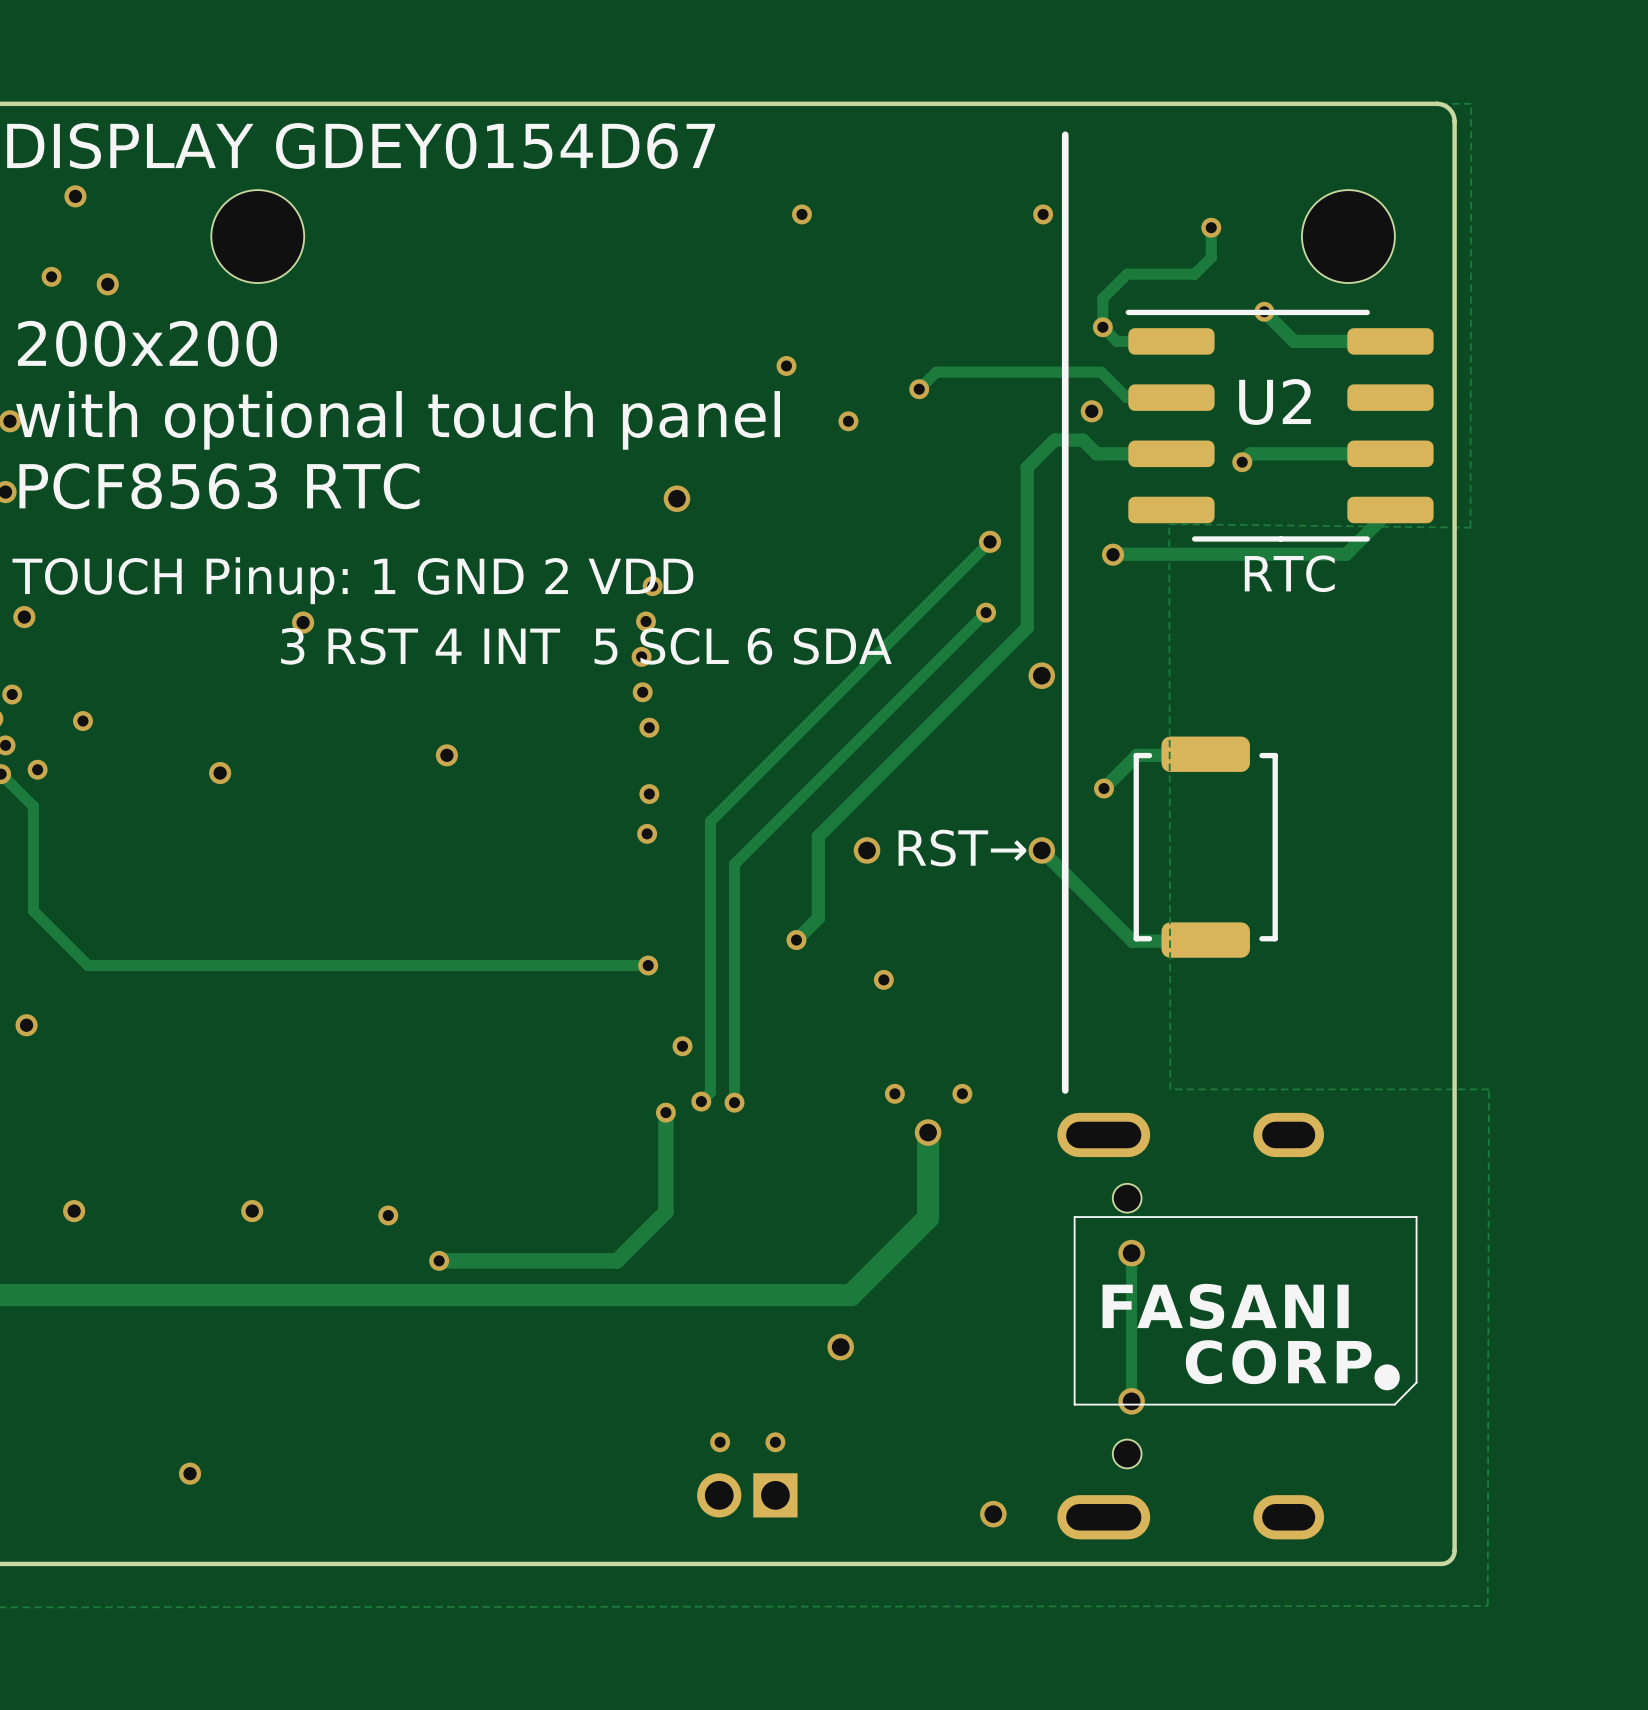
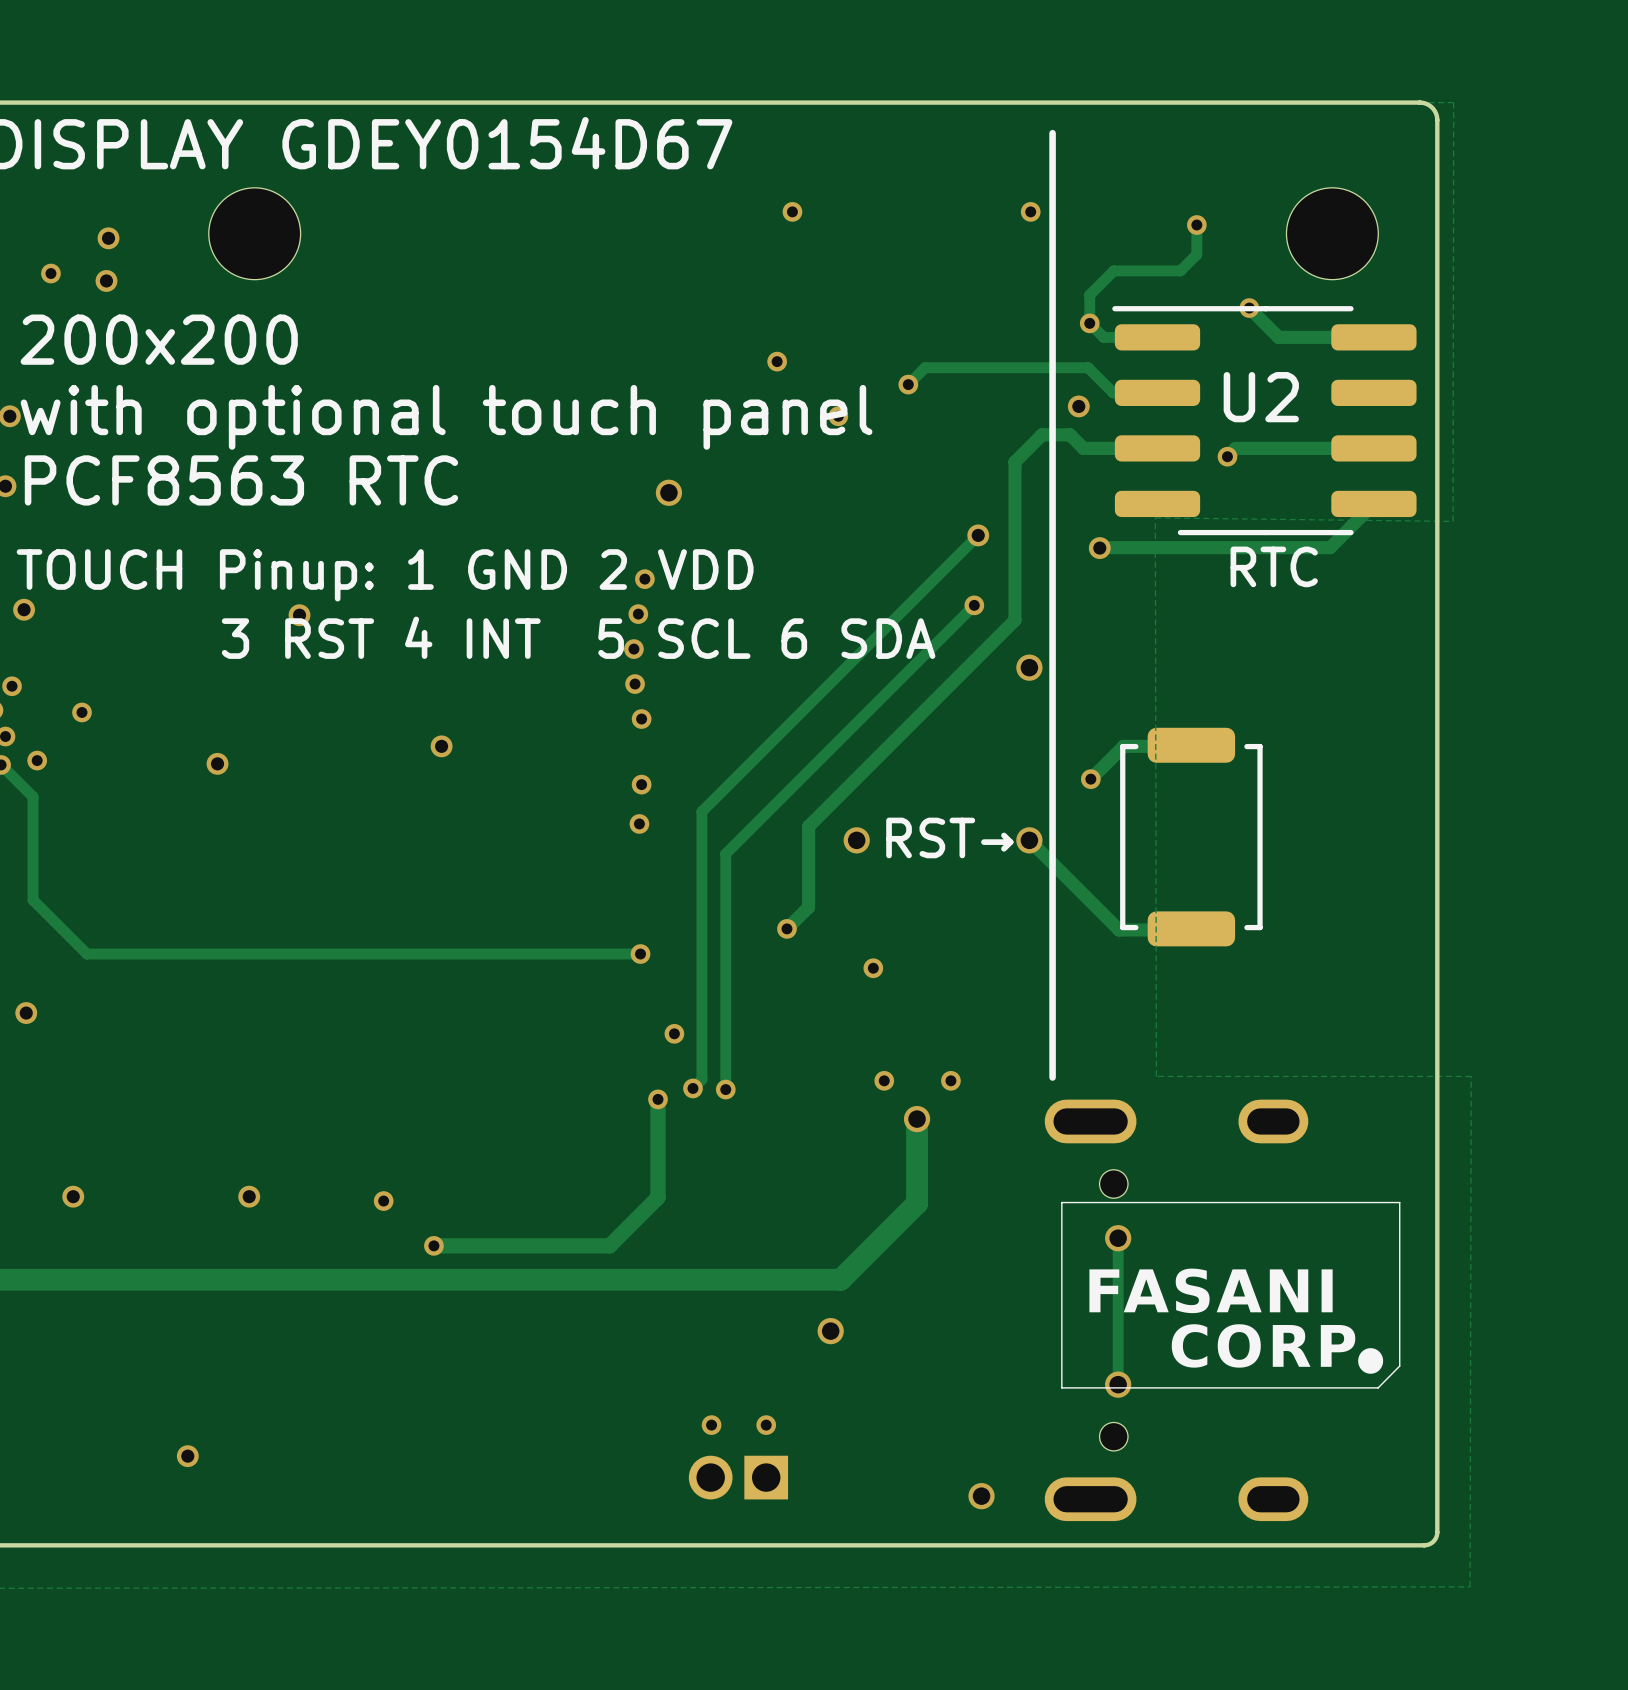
via: (75, 196) -> none
via: none -> (108, 238)

